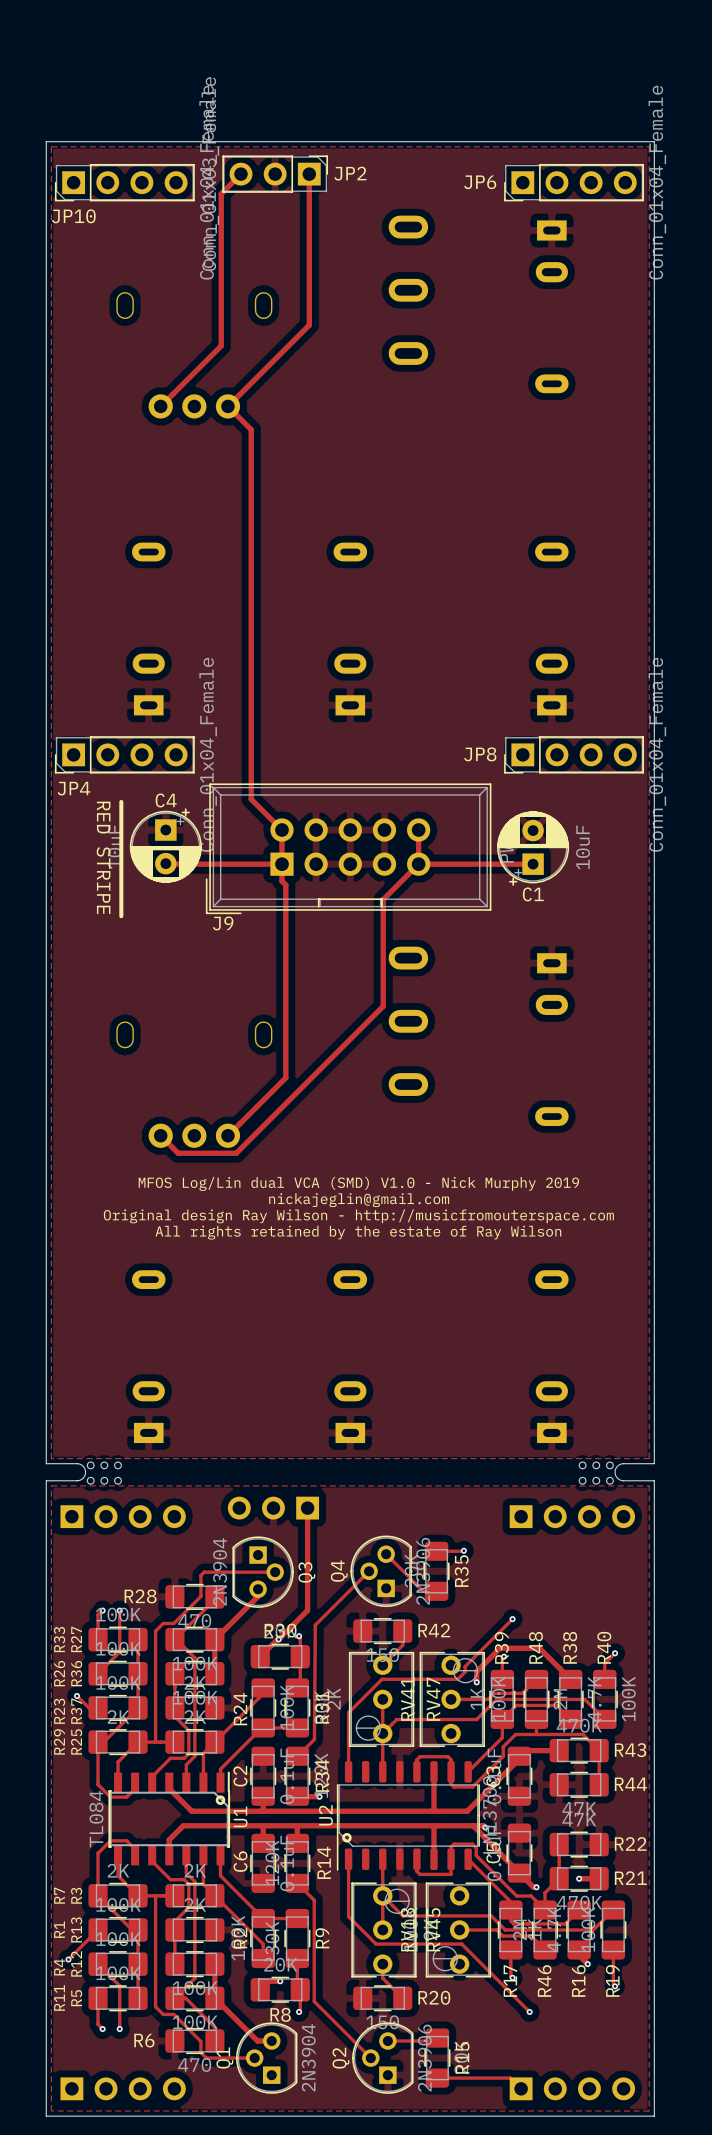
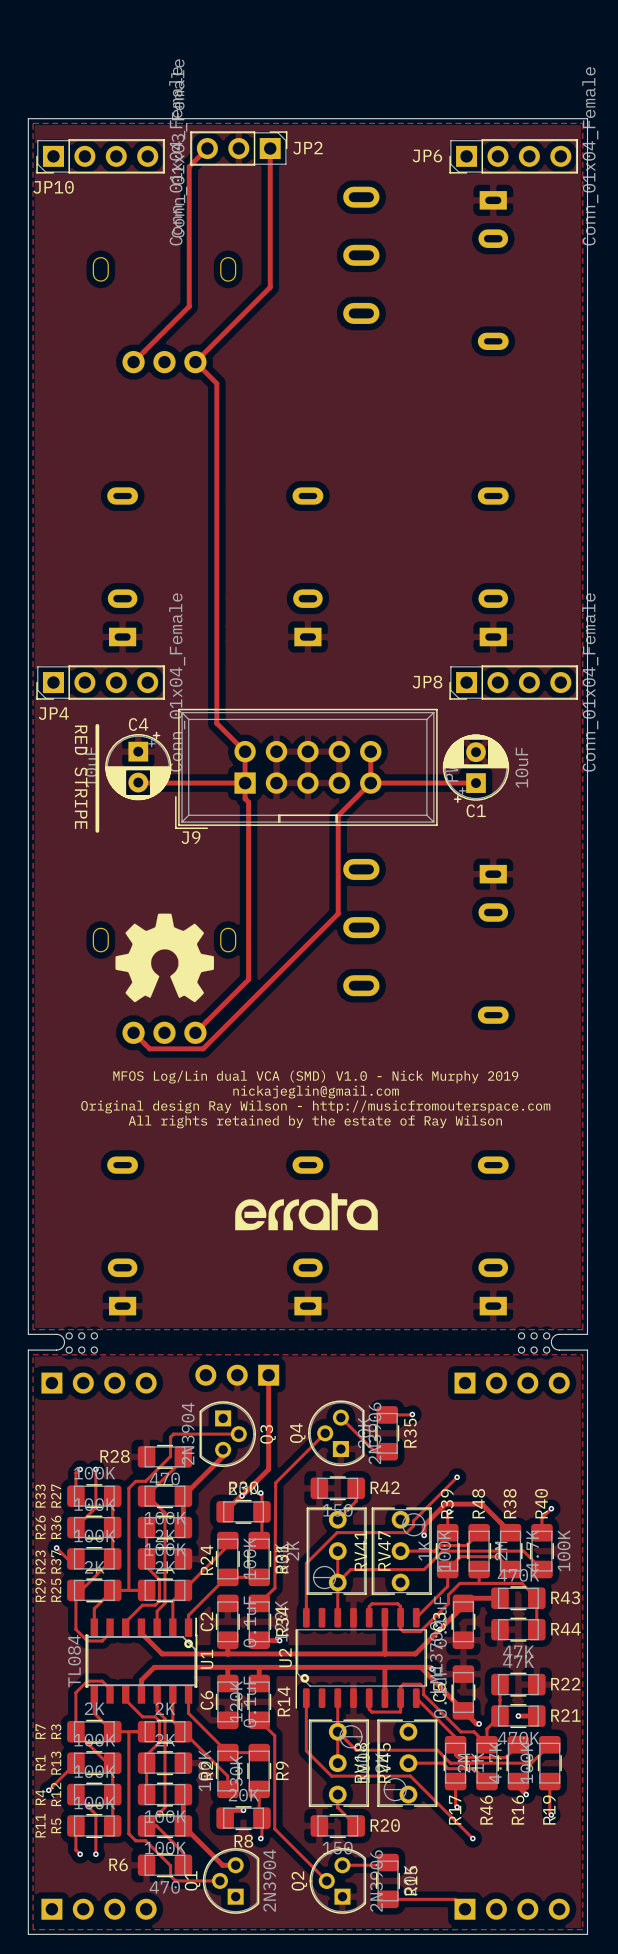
drawing: none -> [115, 913, 215, 1003]
drawing: none -> [235, 1193, 378, 1231]

